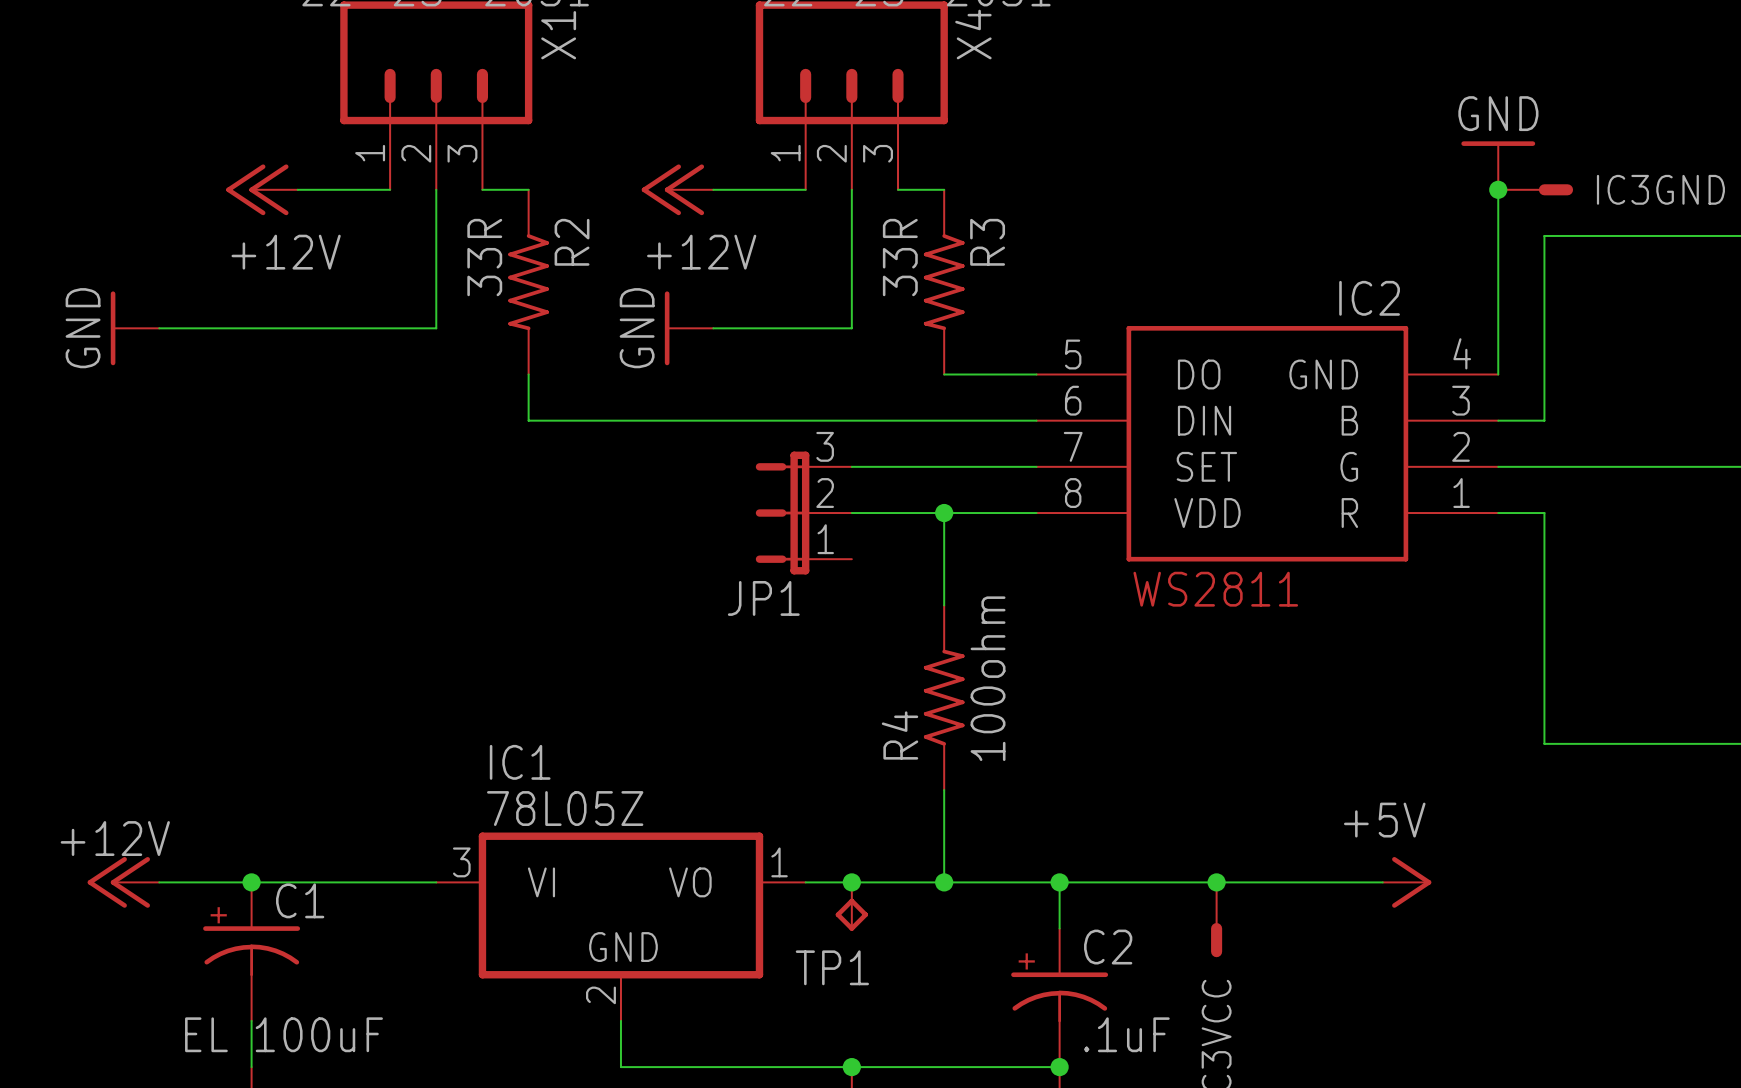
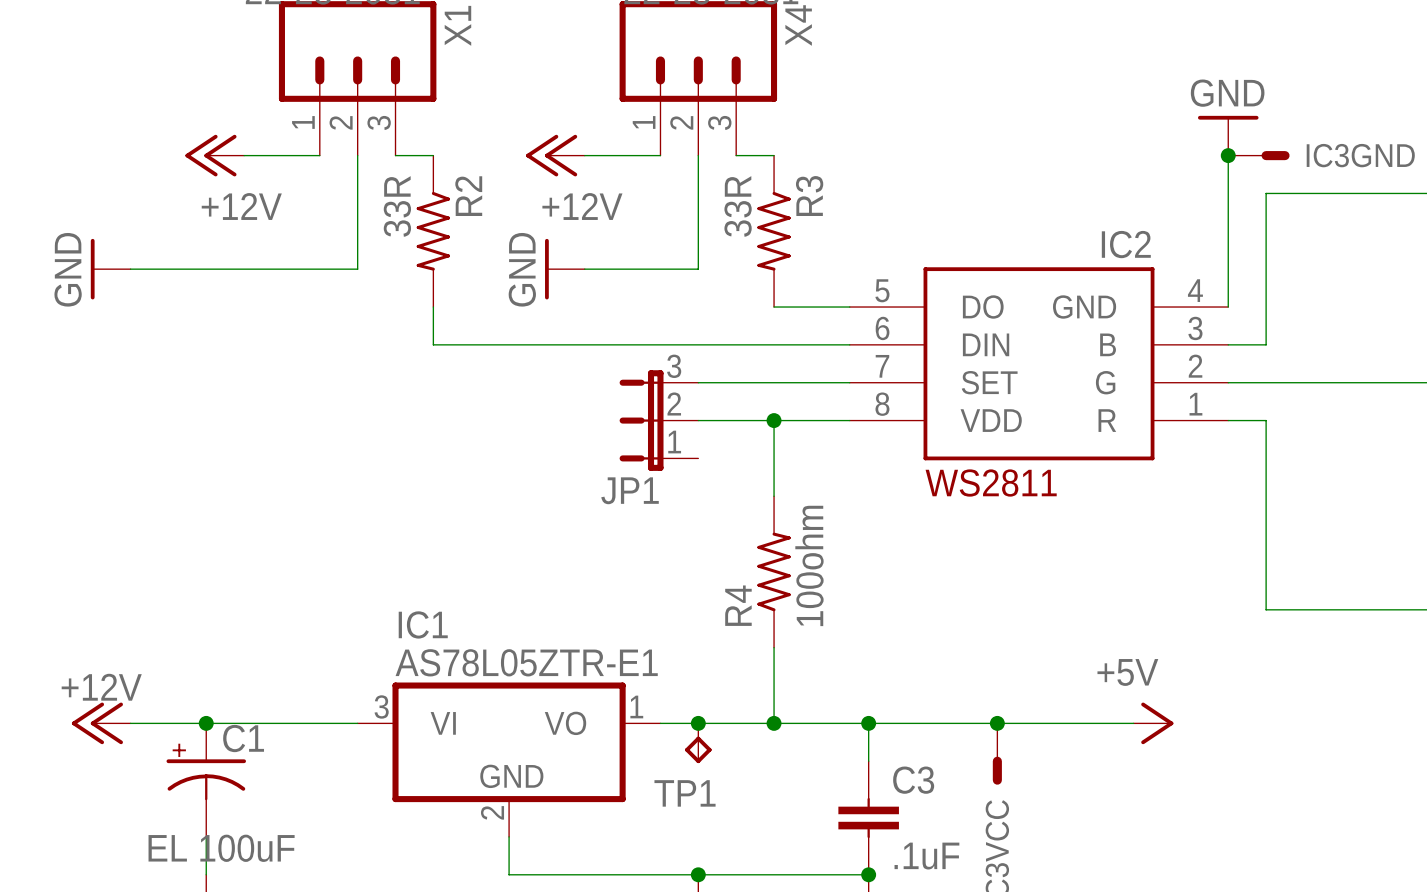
IC1 value: 78L05Z (565, 808) -> AS78L05ZTR-E1 (526, 662)
C2: .1uF (1059, 997) -> none
C3: none -> .1uF (868, 818)

